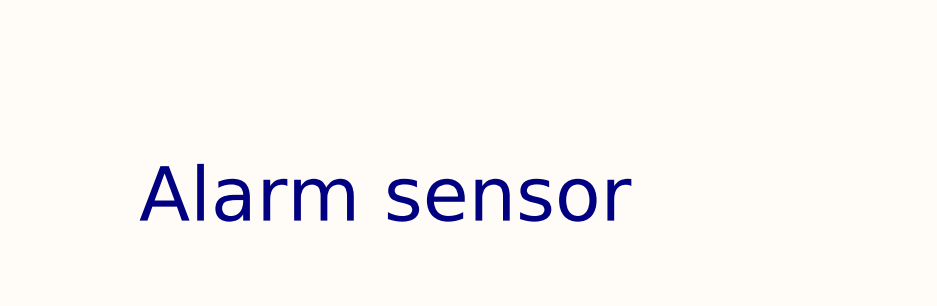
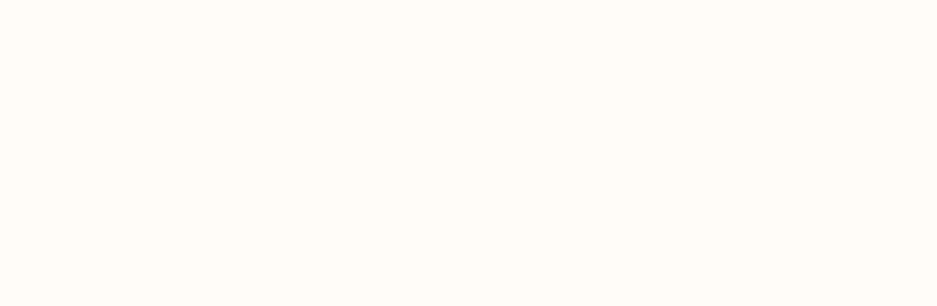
text: Alarm sensor (385, 192) -> none

